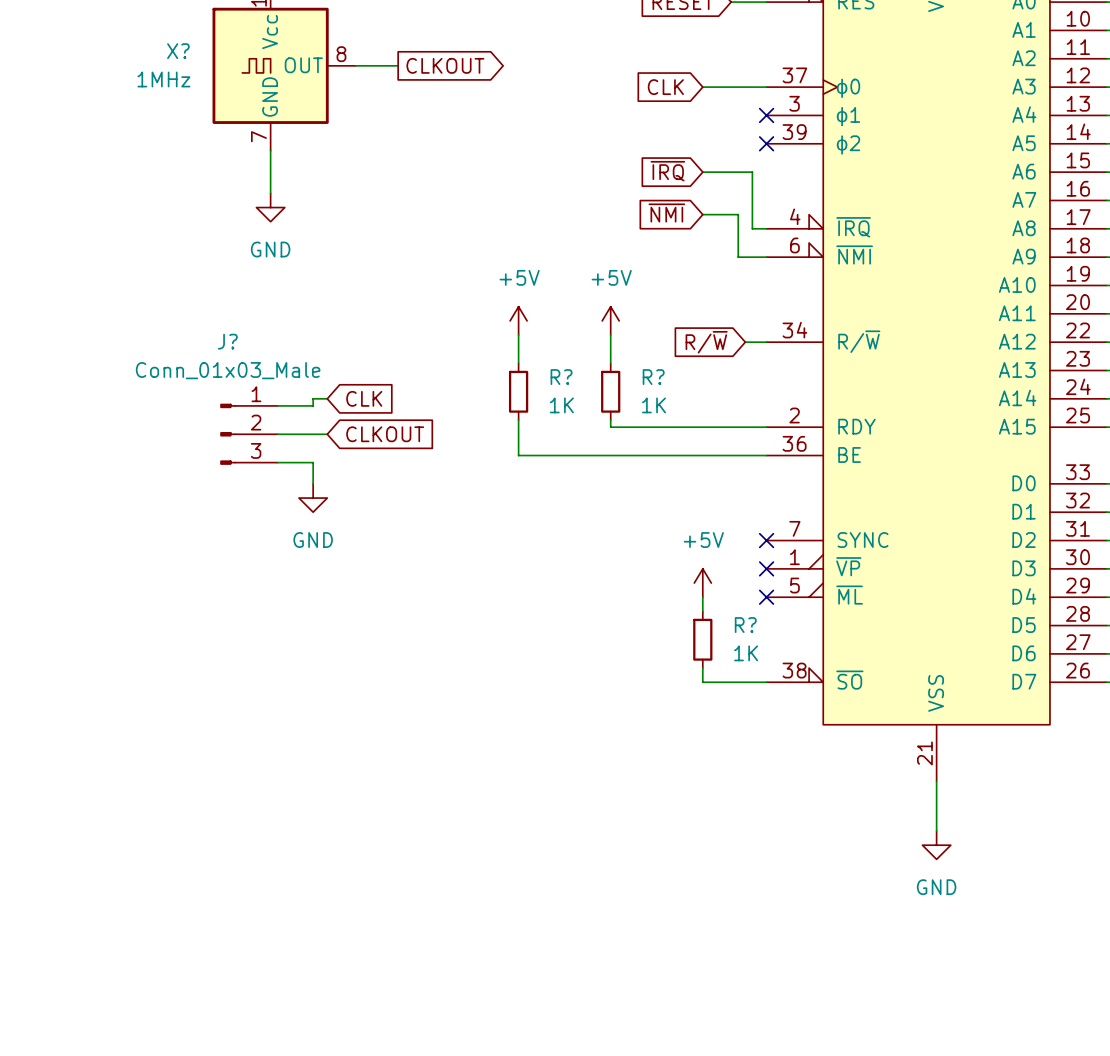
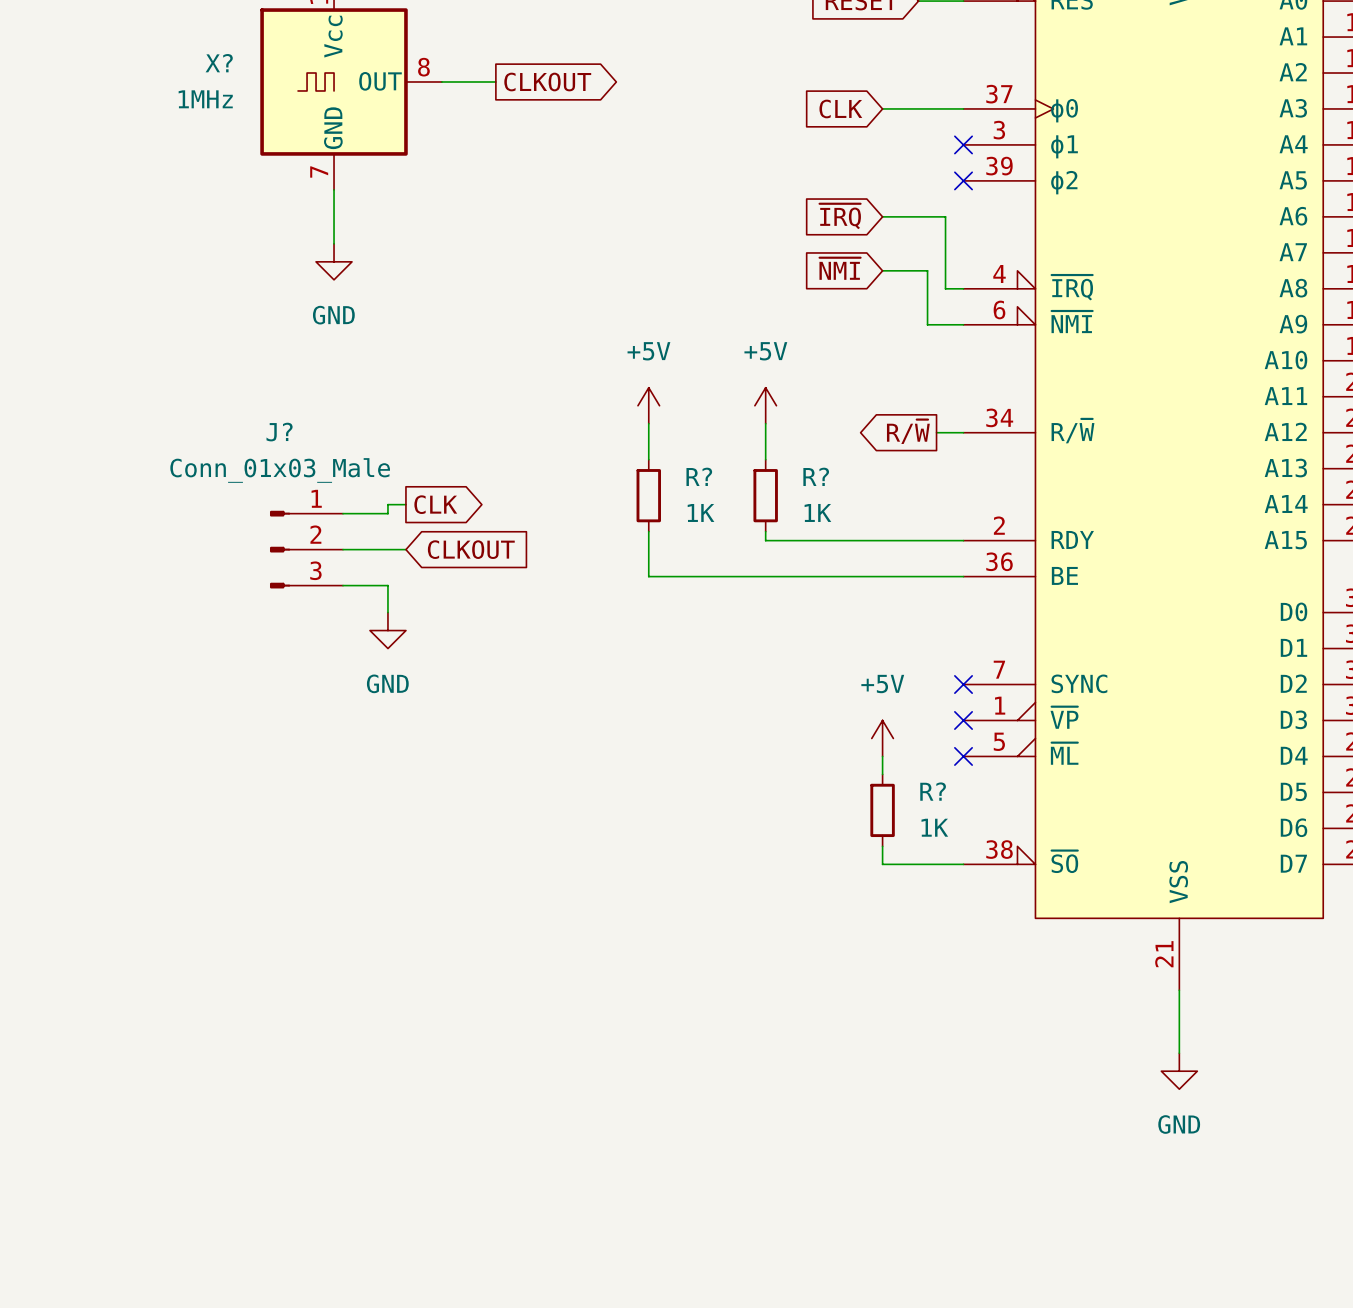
global label shape: input (706, 342) -> output (908, 431)
global label shape: input (364, 398) -> output (435, 504)

